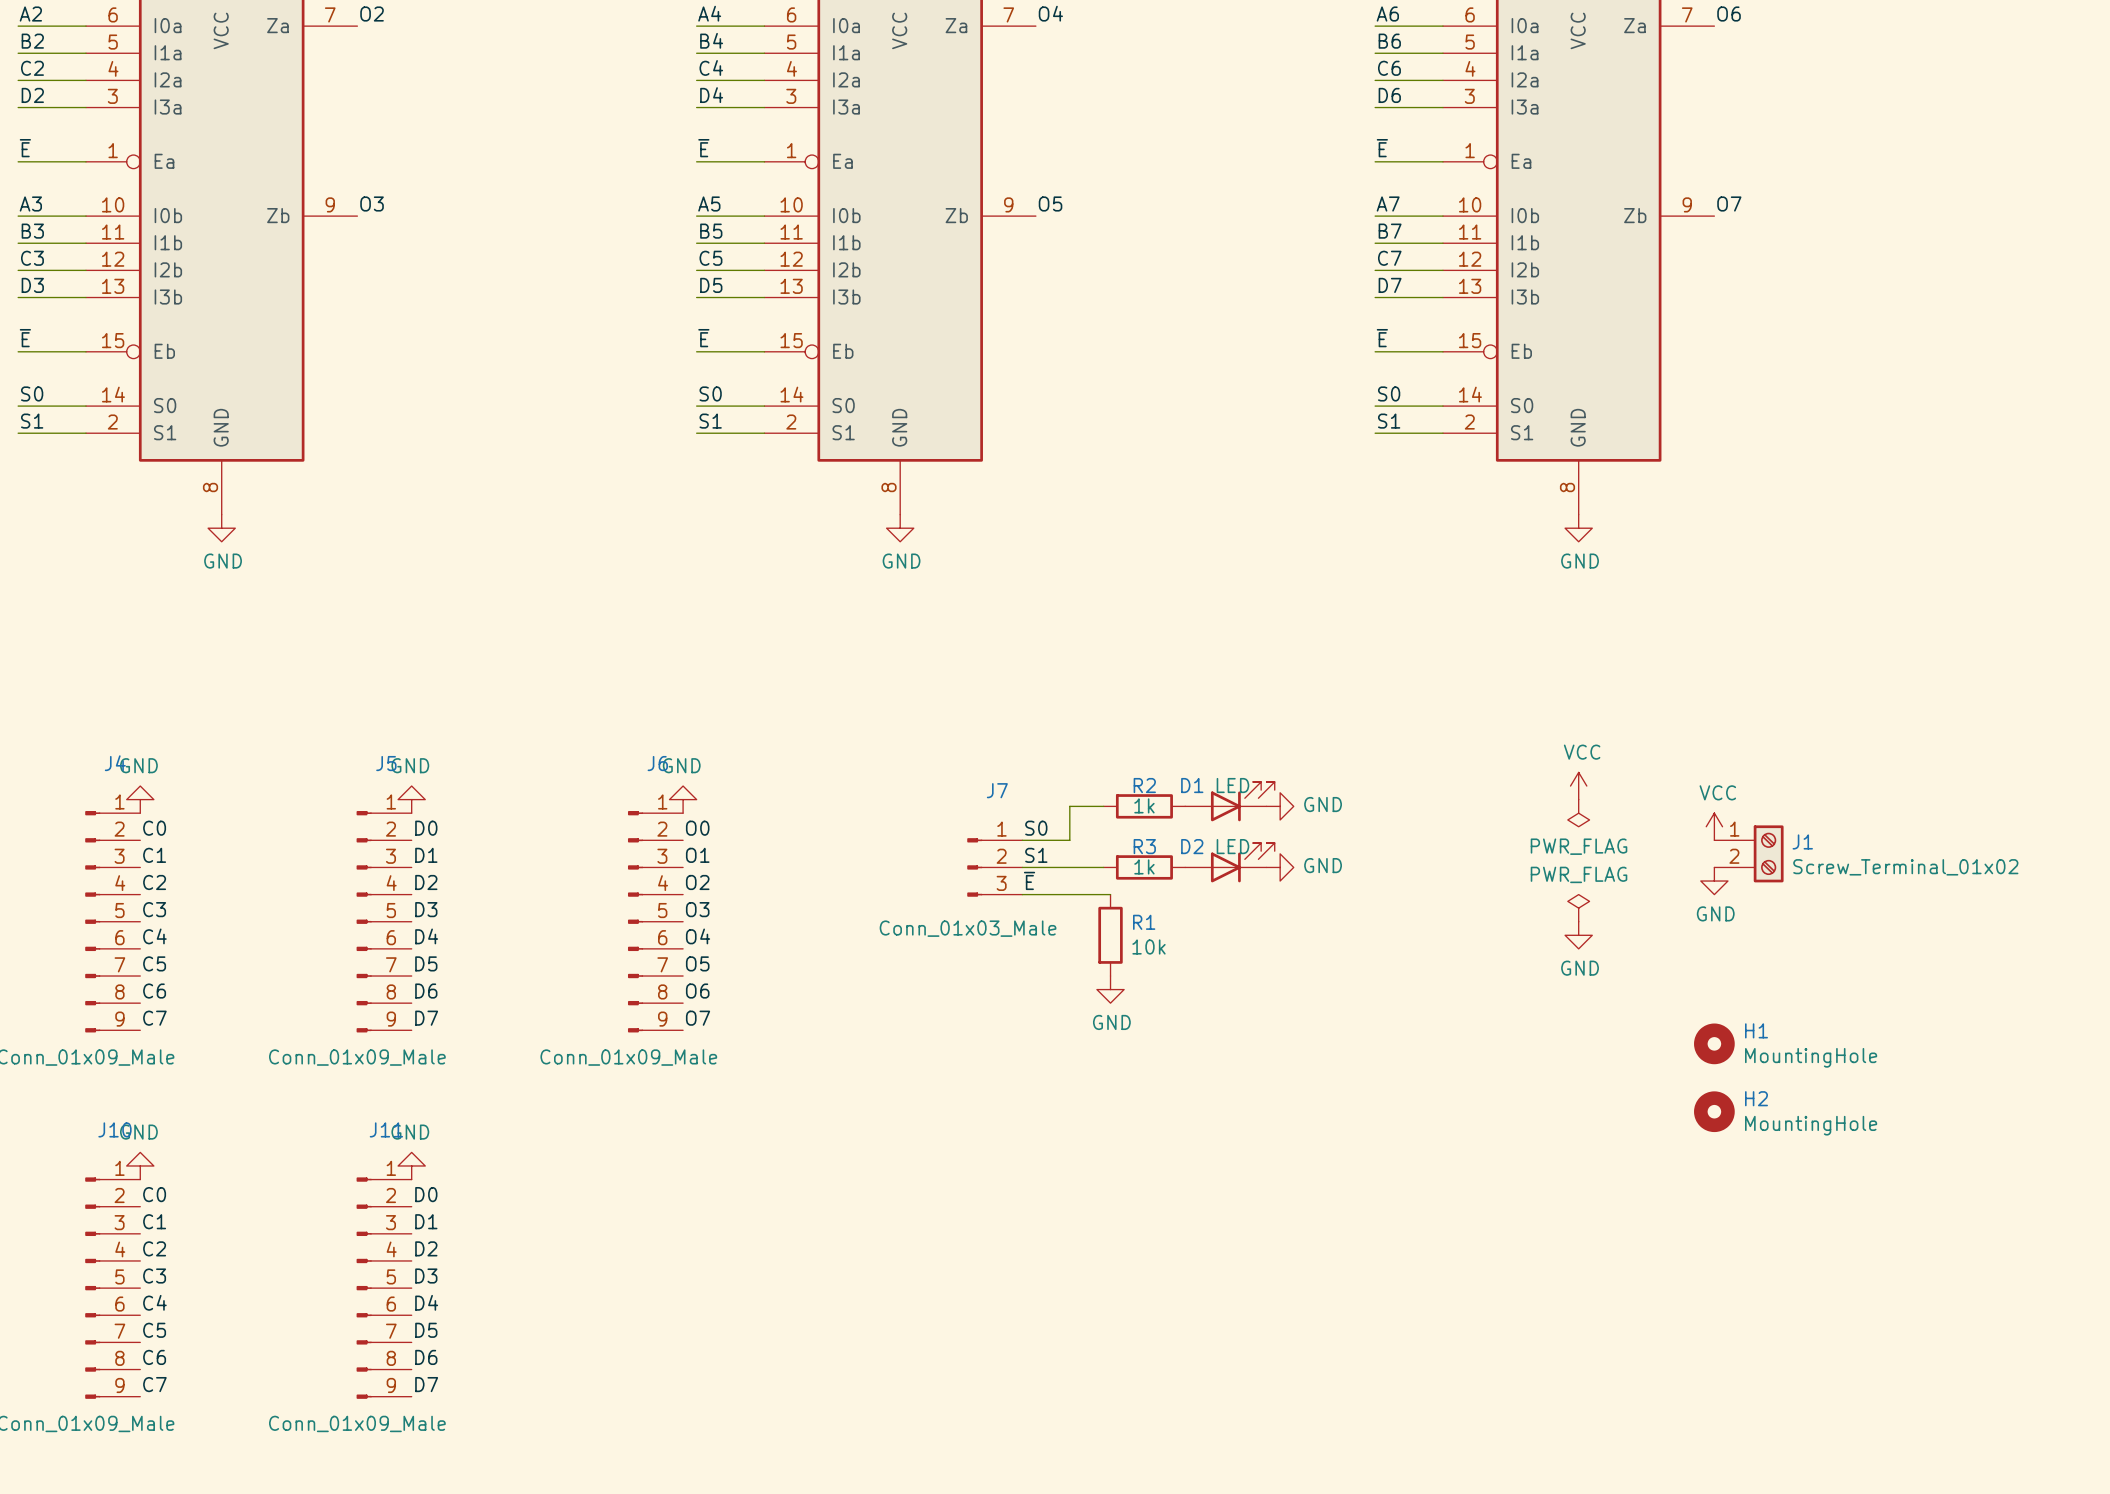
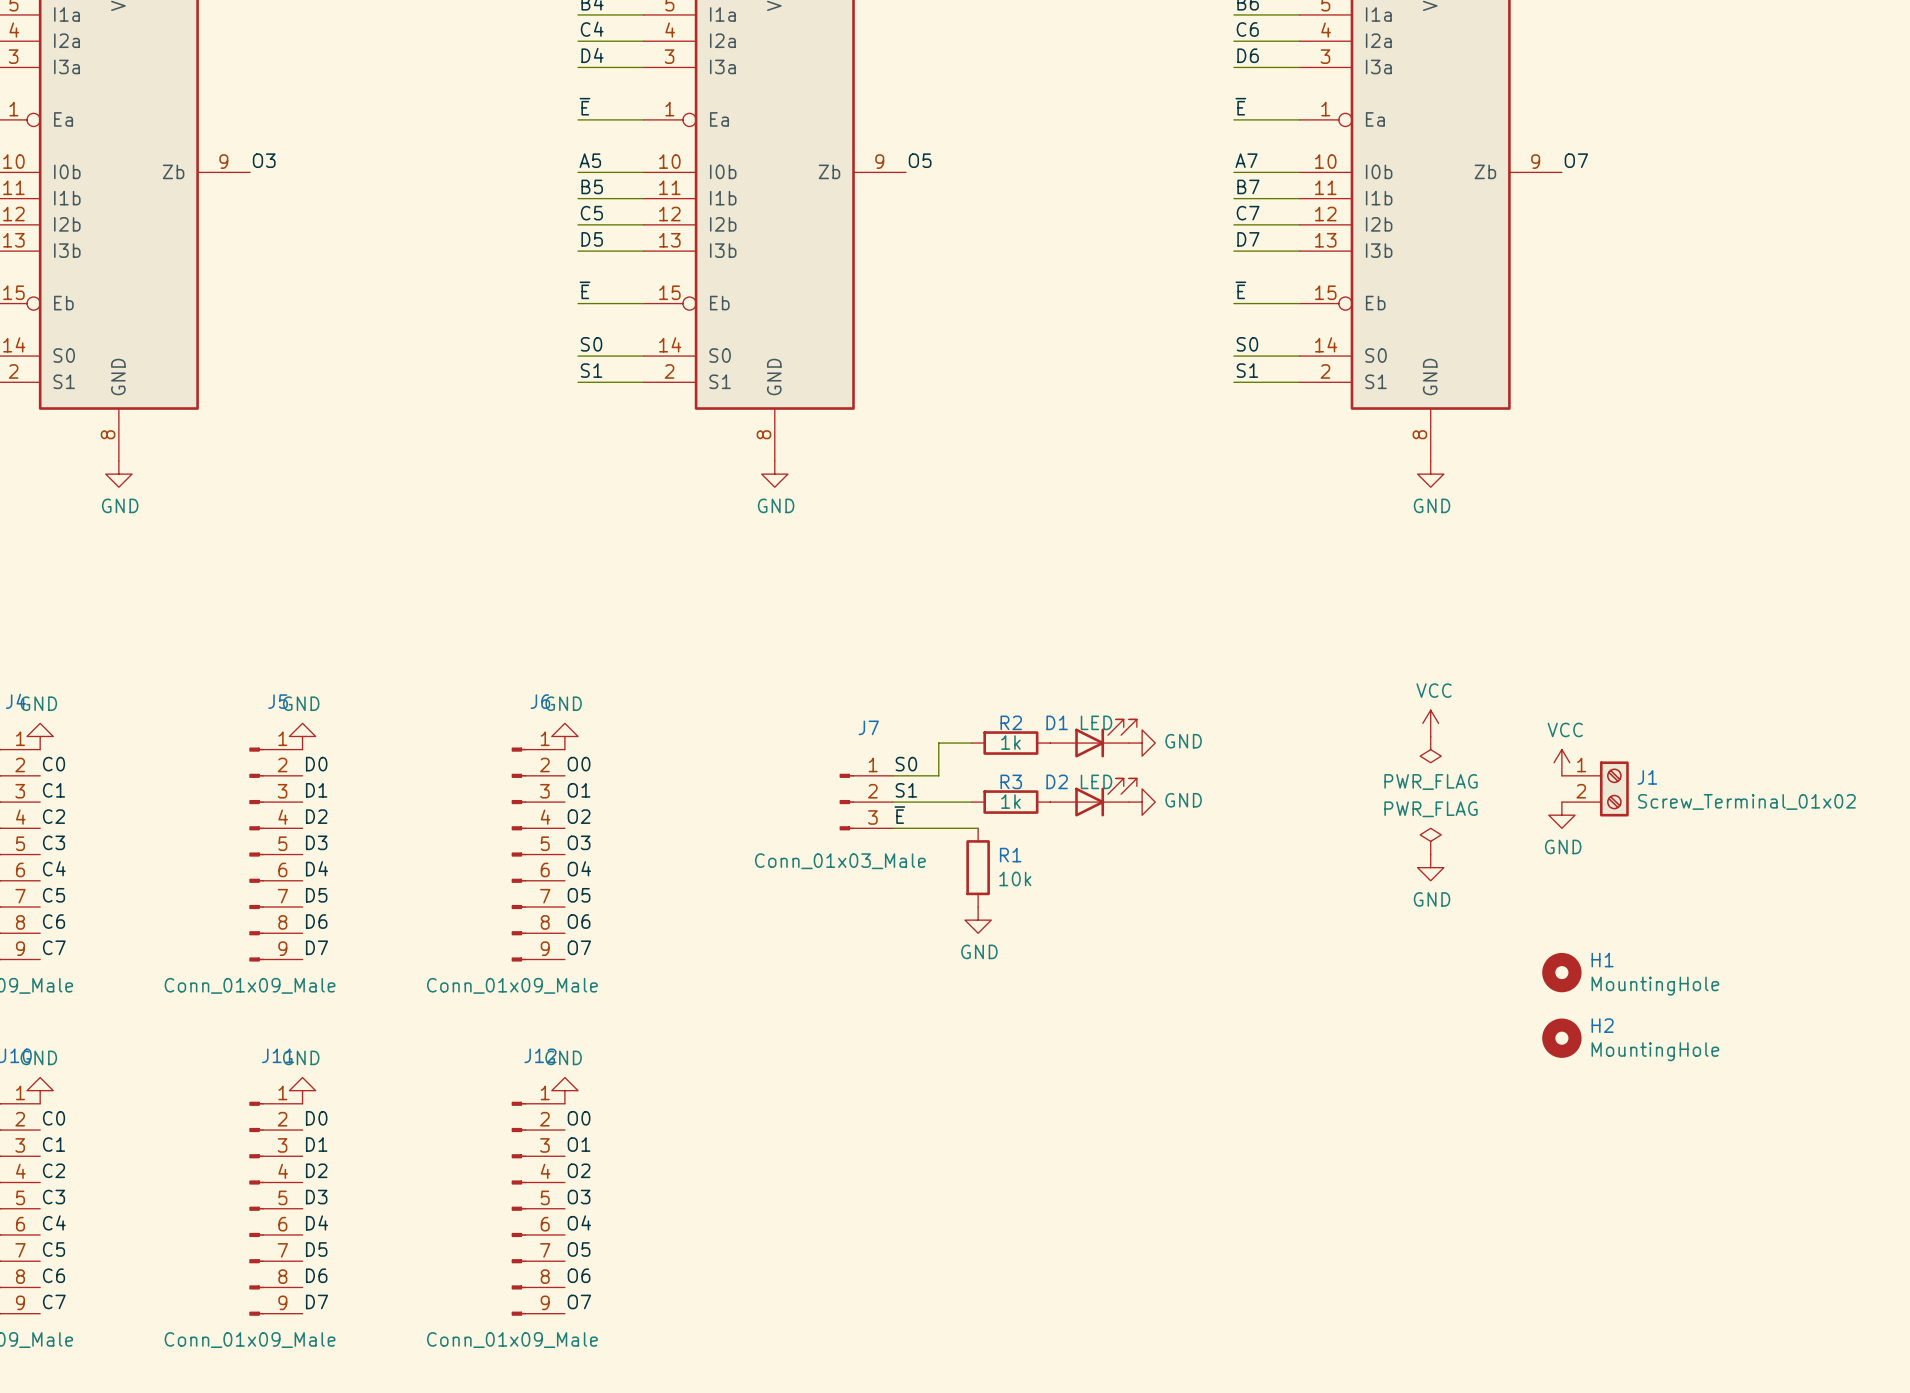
power symbol: none -> GND (564, 1090)
label: none -> O0 (579, 1118)
label: none -> O1 (579, 1144)
label: none -> O2 (579, 1170)
label: none -> O3 (579, 1197)
J12: none -> Conn_01x09_Male (538, 1208)
label: none -> O4 (579, 1222)
label: none -> O5 (579, 1249)
label: none -> O6 (579, 1275)
label: none -> O7 (579, 1301)

